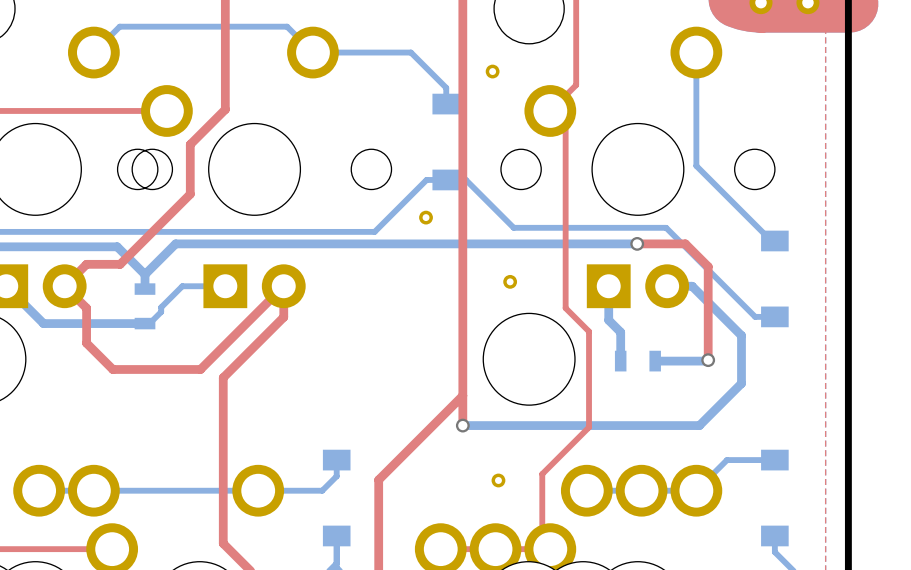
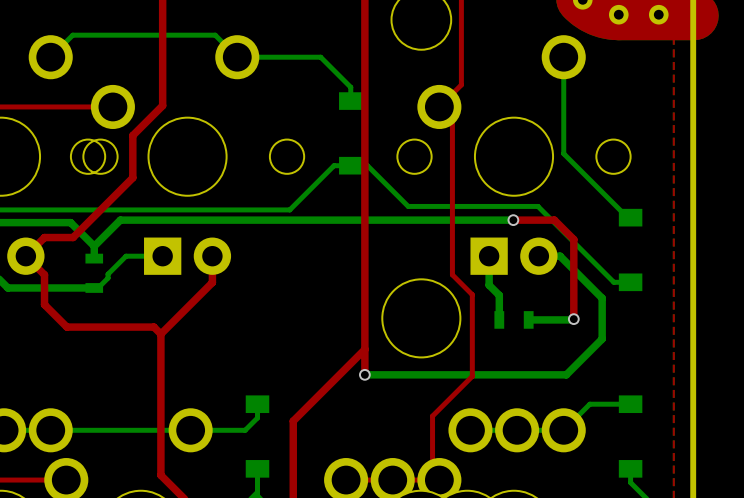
part: (492, 71) -> none
part: (426, 217) -> none
part: (510, 281) -> none
top track: (283, 286) (200, 369) -> (160, 334) (153, 327) (141, 327)
part: (498, 480) -> none

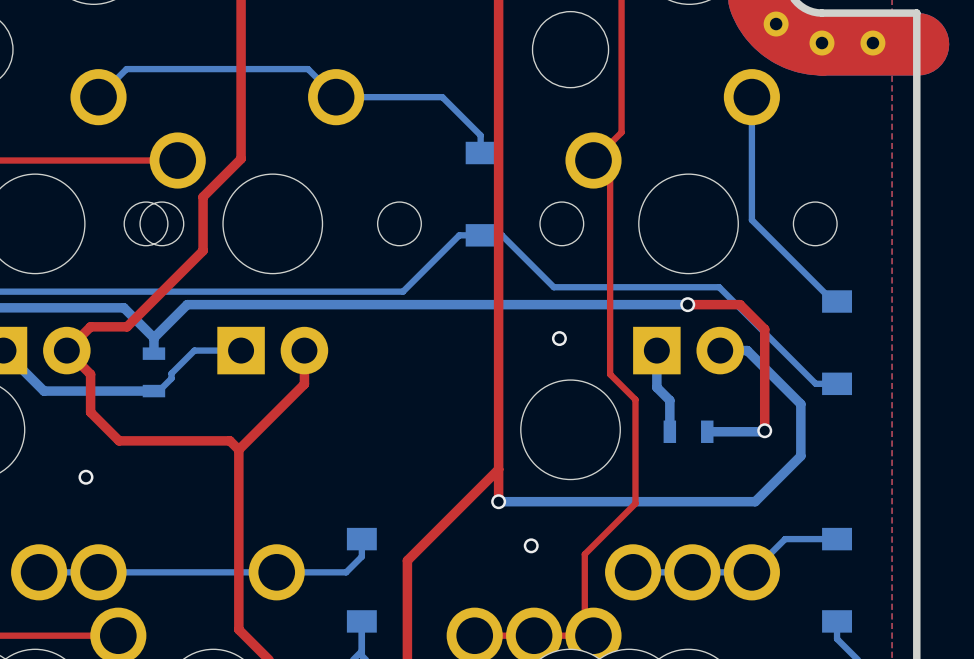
via: none -> (559, 338)
via: none -> (85, 477)
via: none -> (531, 545)

